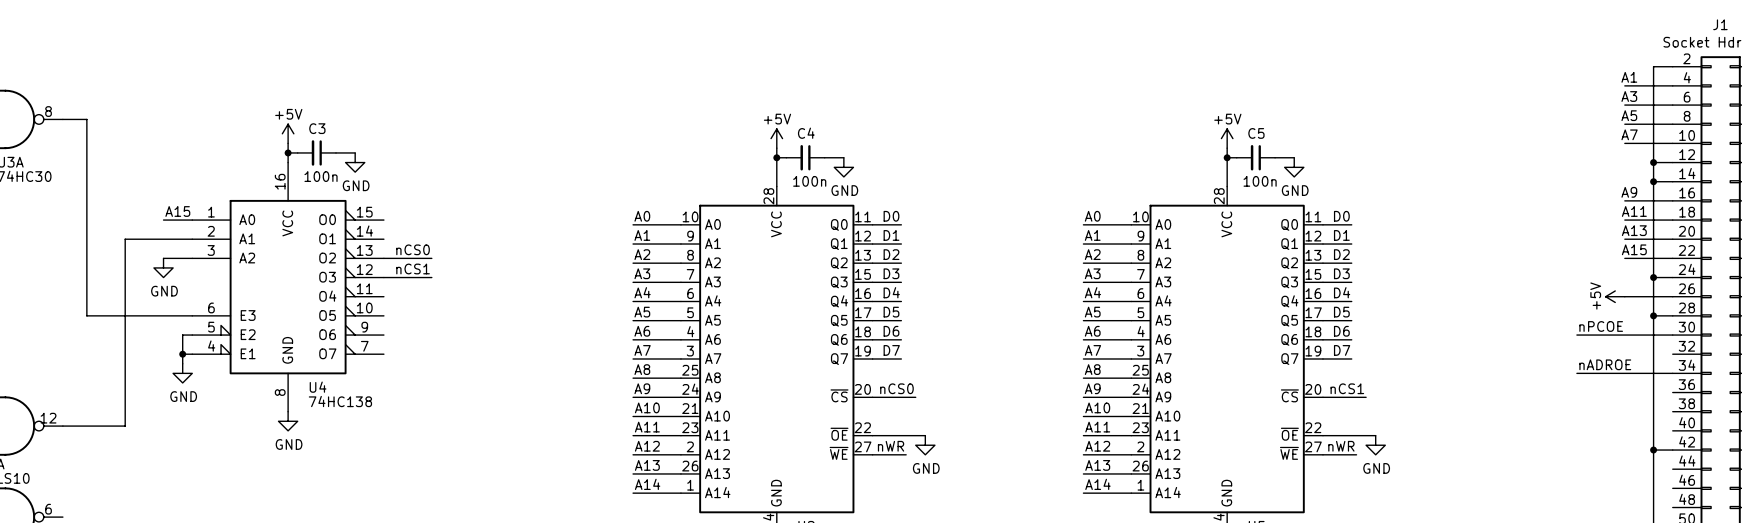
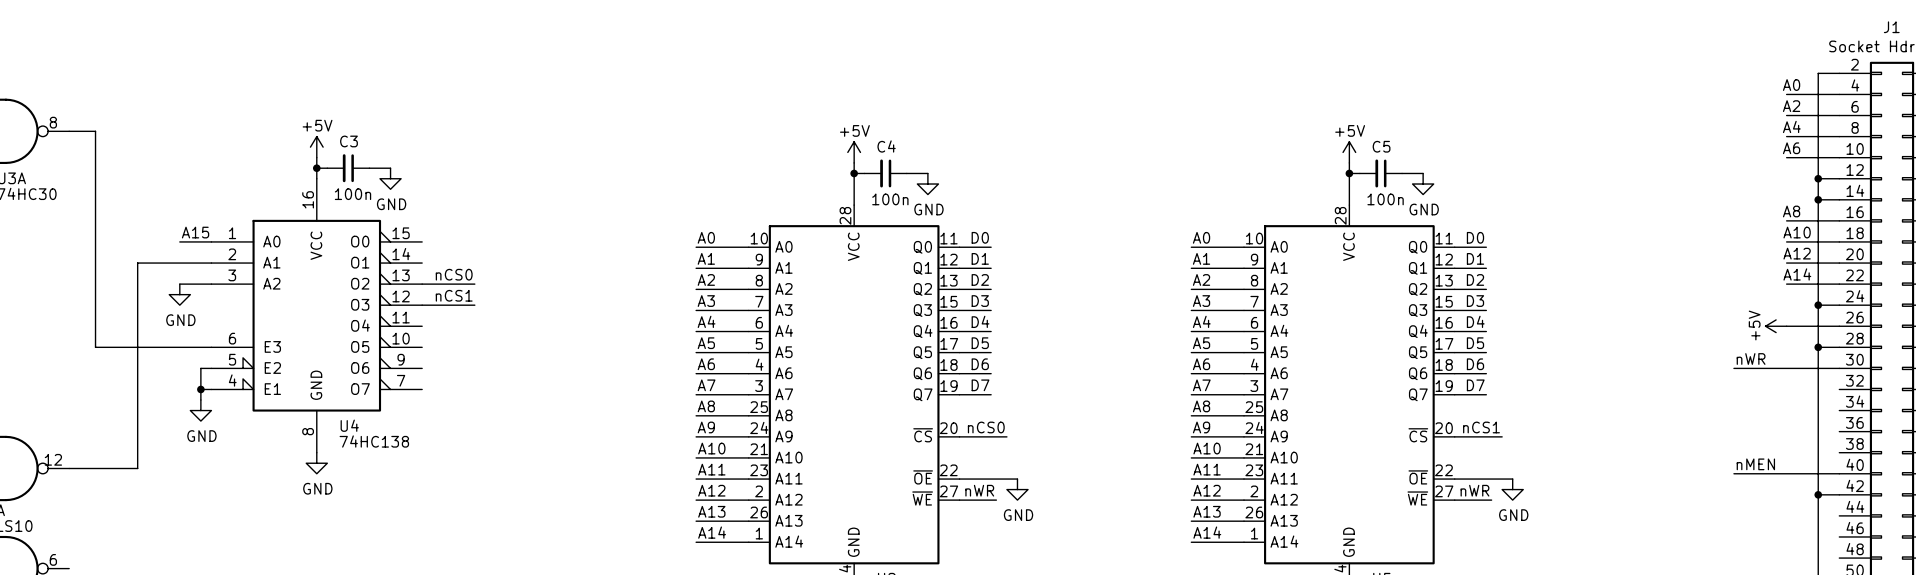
label: A1 (1629, 77) -> A0 (1791, 85)
label: A3 (1629, 96) -> A2 (1791, 106)
label: A5 (1629, 115) -> A4 (1791, 126)
label: A7 (1629, 134) -> A6 (1791, 148)
label: A9 (1629, 192) -> A8 (1791, 211)
label: A11 (1634, 211) -> A10 (1797, 232)
label: A13 (1634, 230) -> A12 (1797, 253)
label: A15 (1634, 249) -> A14 (1797, 274)
label: nPCOE (1601, 326) -> nWR (1751, 359)
label: nADROE (1605, 364) -> none
wire: (1576, 373) (1672, 373) -> (1733, 473) (1839, 473)
label: none -> nMEN (1755, 464)

